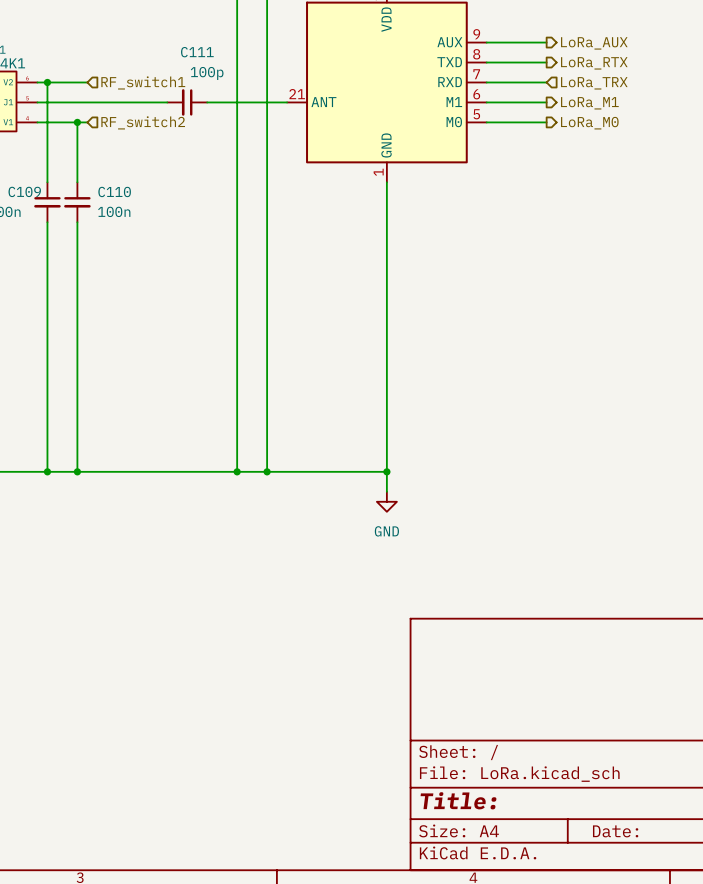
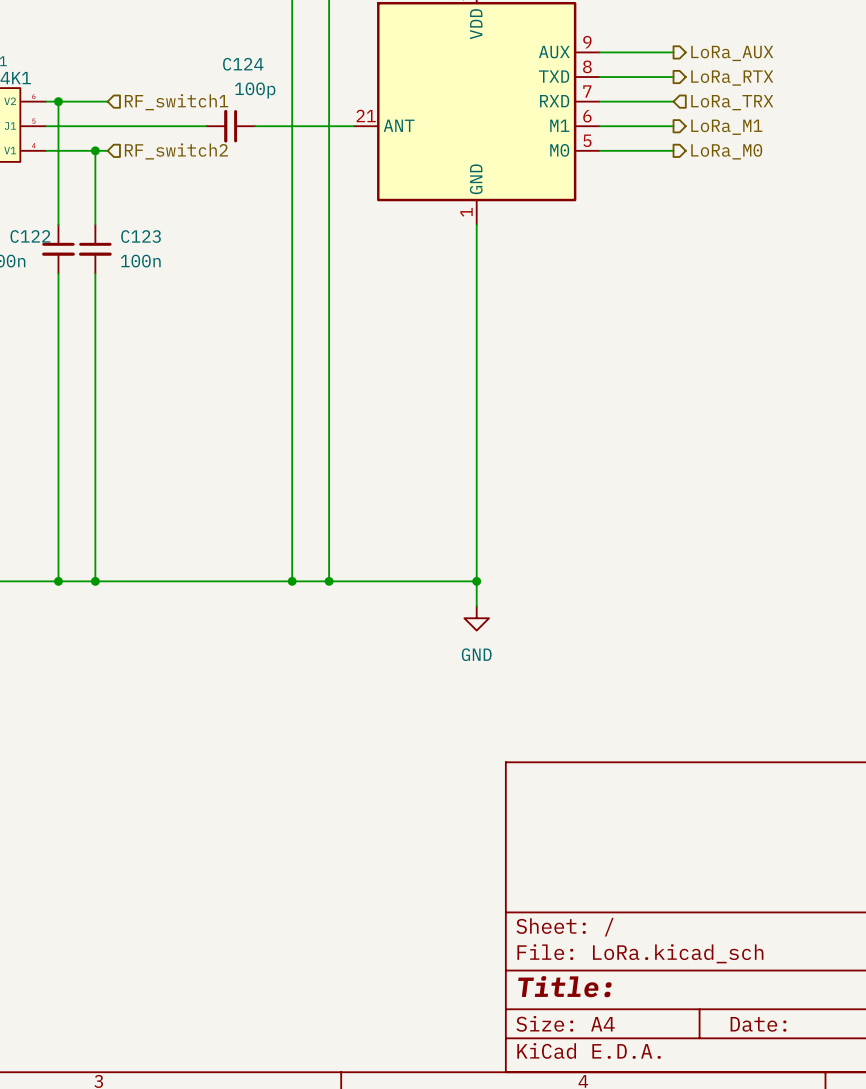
C111 name: C111 (197, 52) -> C124 (243, 64)
C109 name: C109 (24, 191) -> C122 (30, 236)
C110 name: C110 (114, 191) -> C123 (141, 236)

